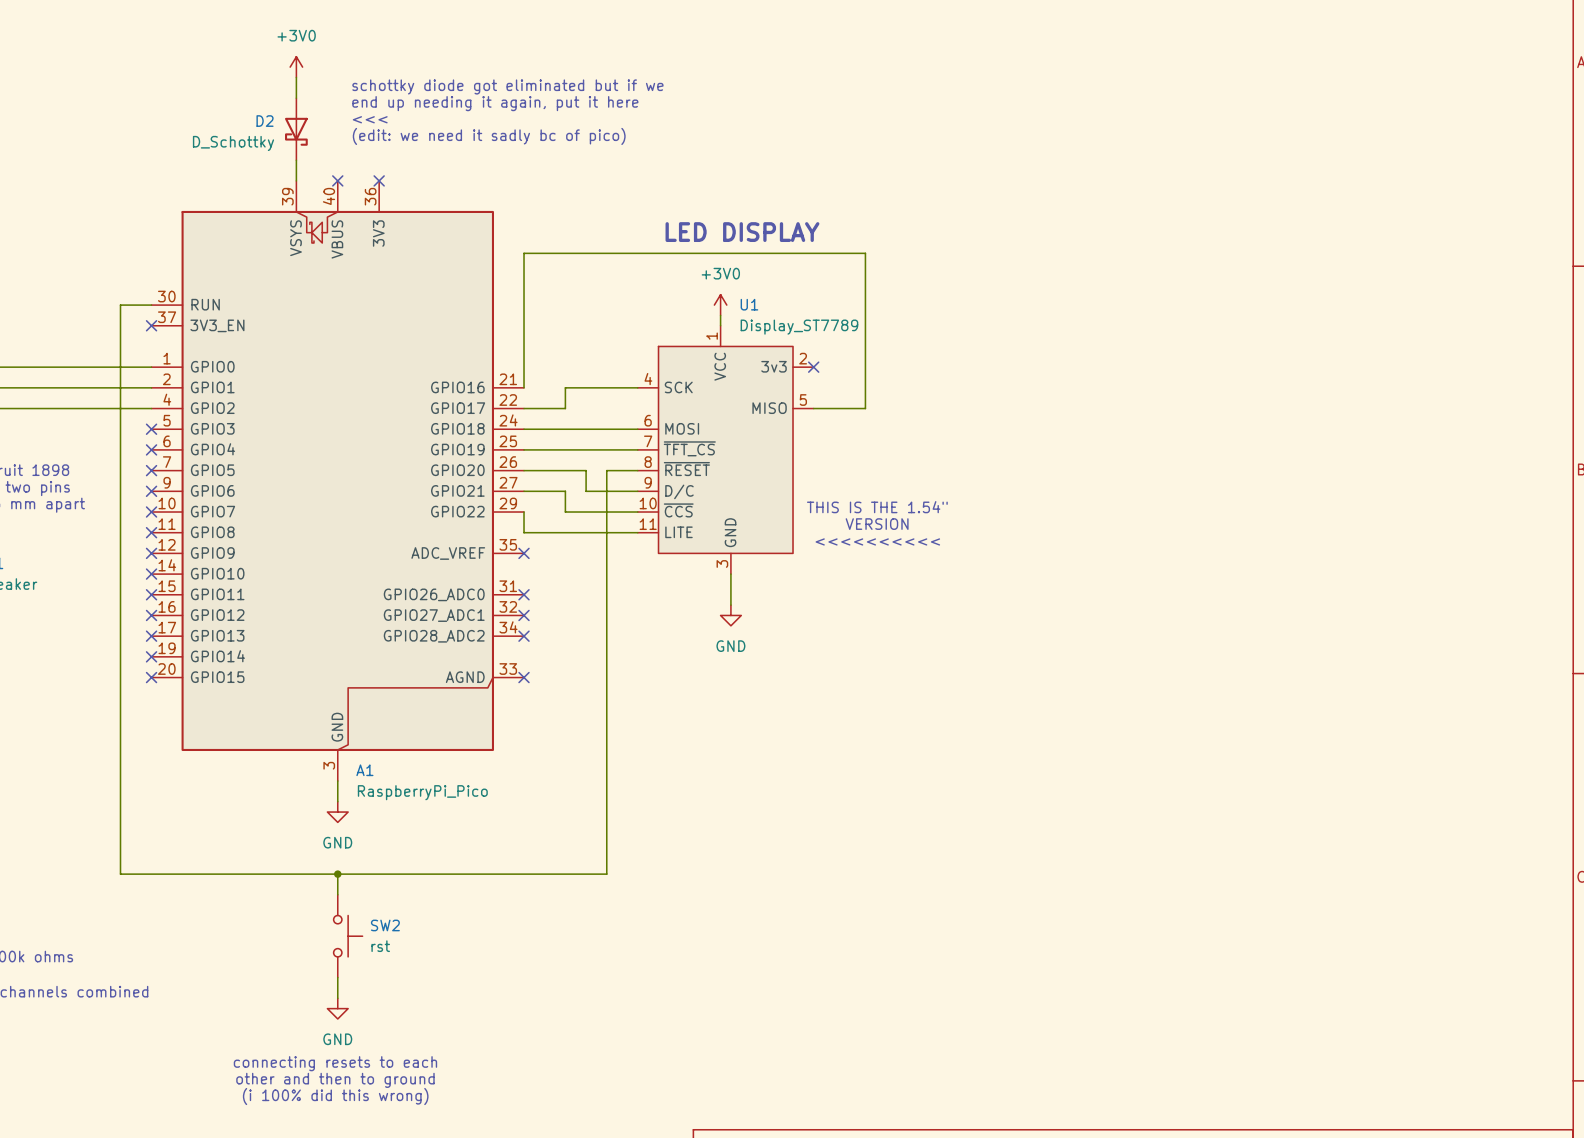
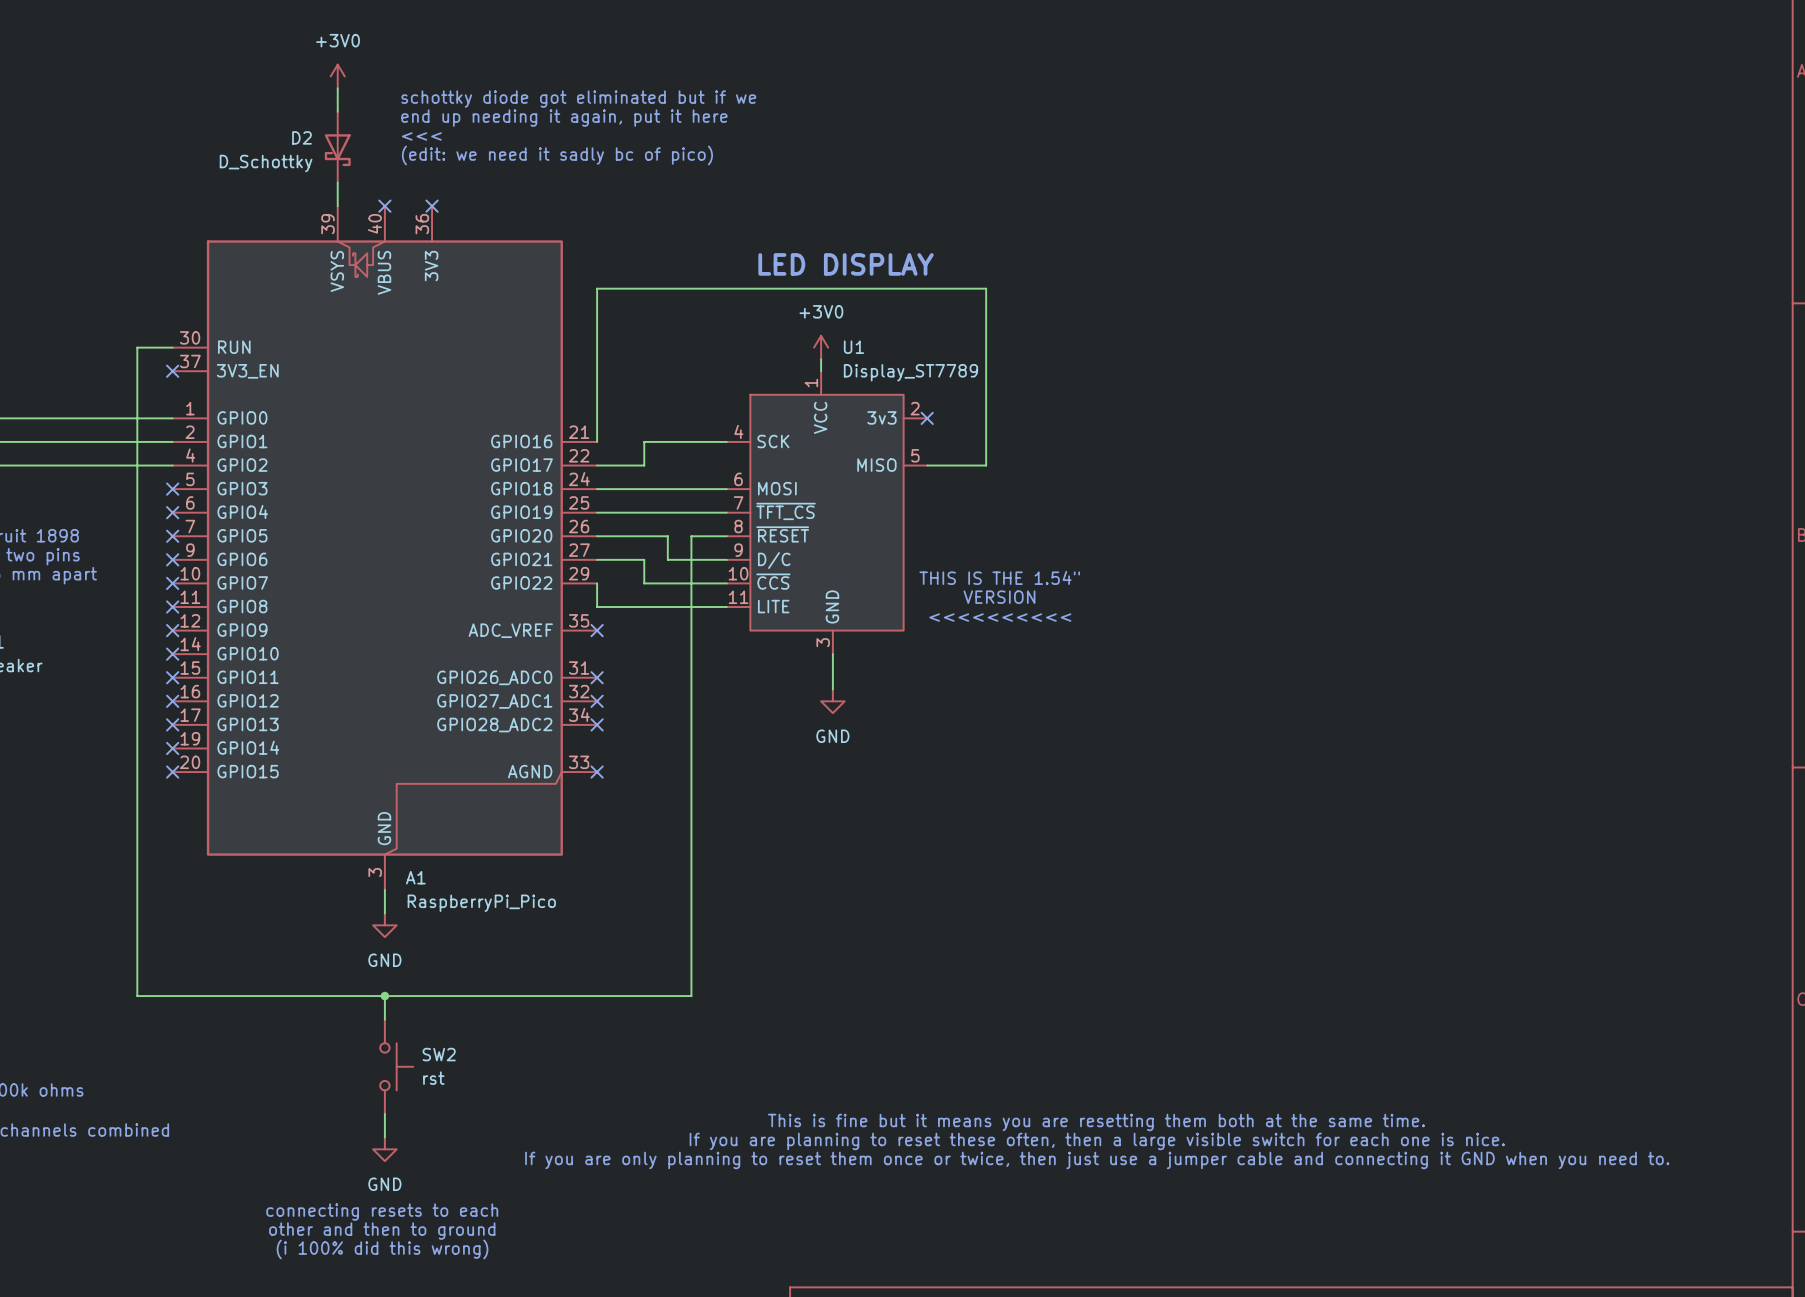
text: none -> This is fine but it means you are resetting them both at the same time. (1096, 1122)
text: none -> If you are planning to reset these often, then a large visible switch for each one is nice. (1097, 1141)
text: none -> If you are only planning to reset them once or twice, then just use a jumper cable and connecting it GND when you need to. (1097, 1160)

